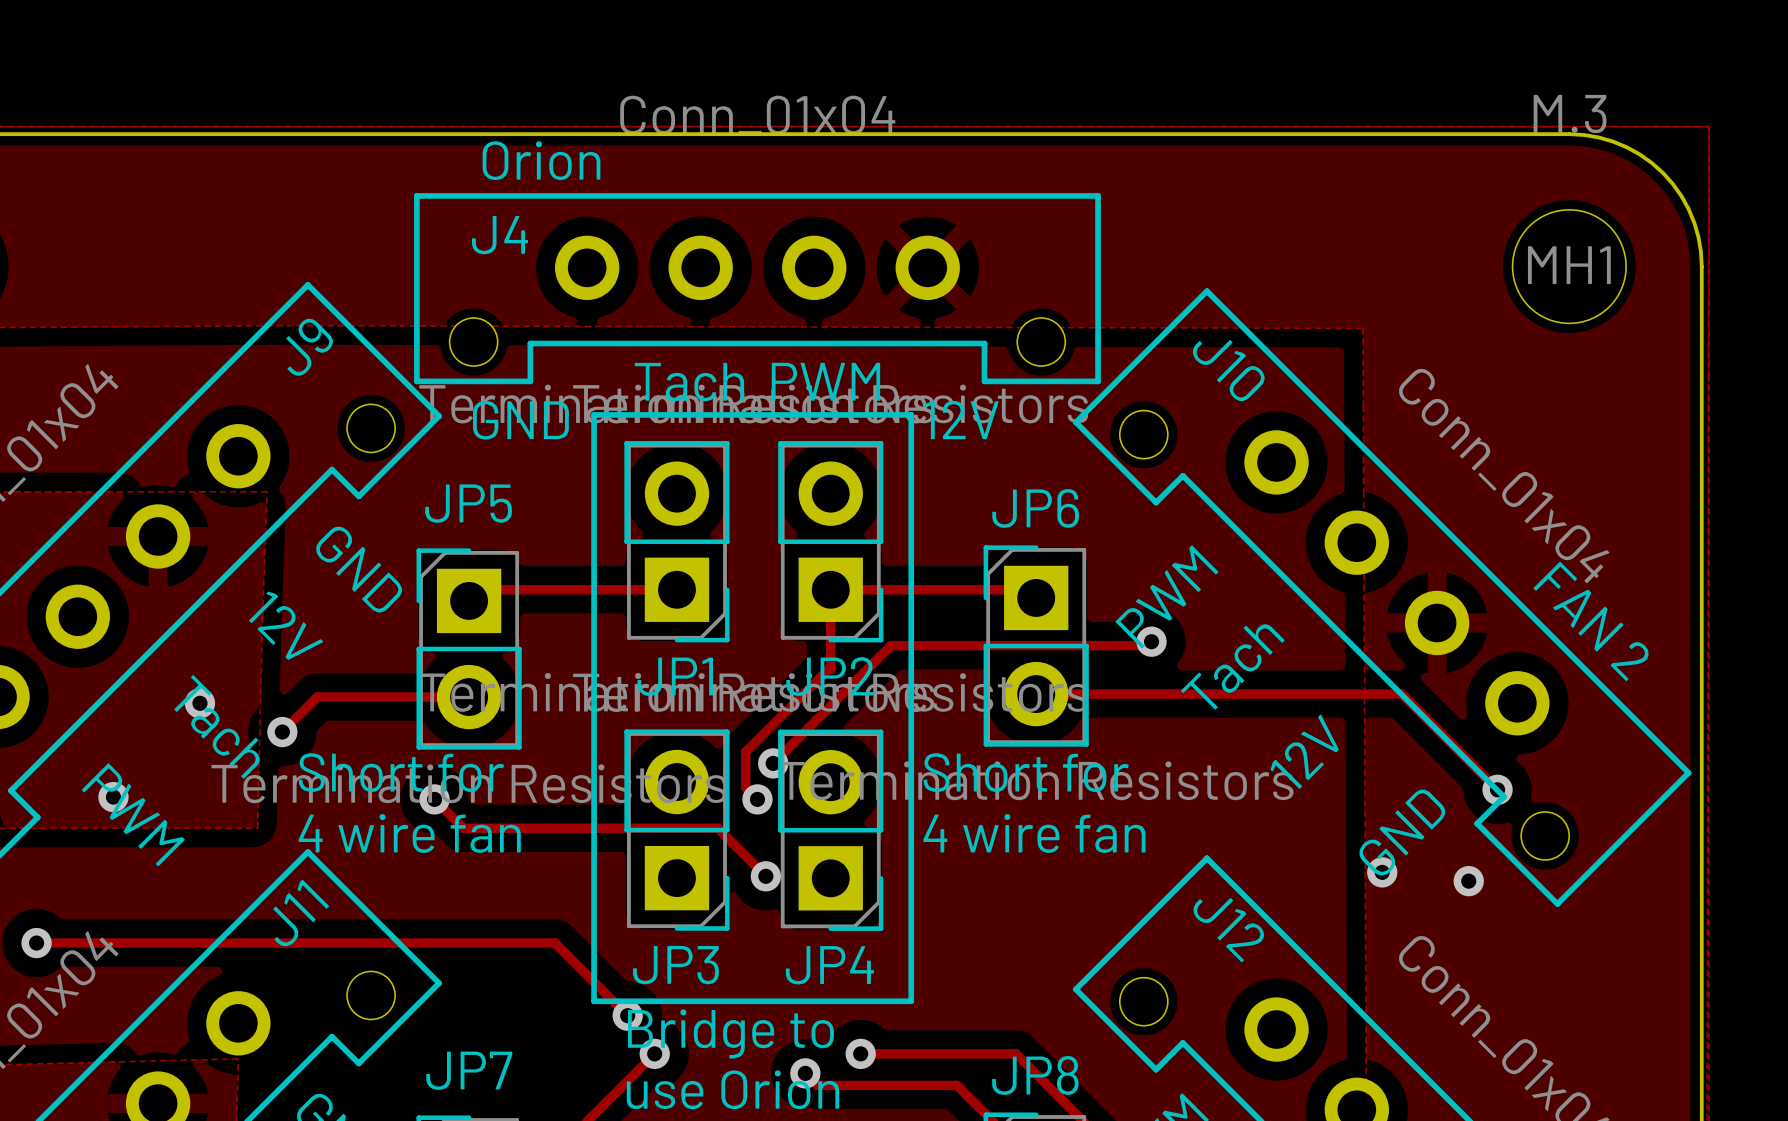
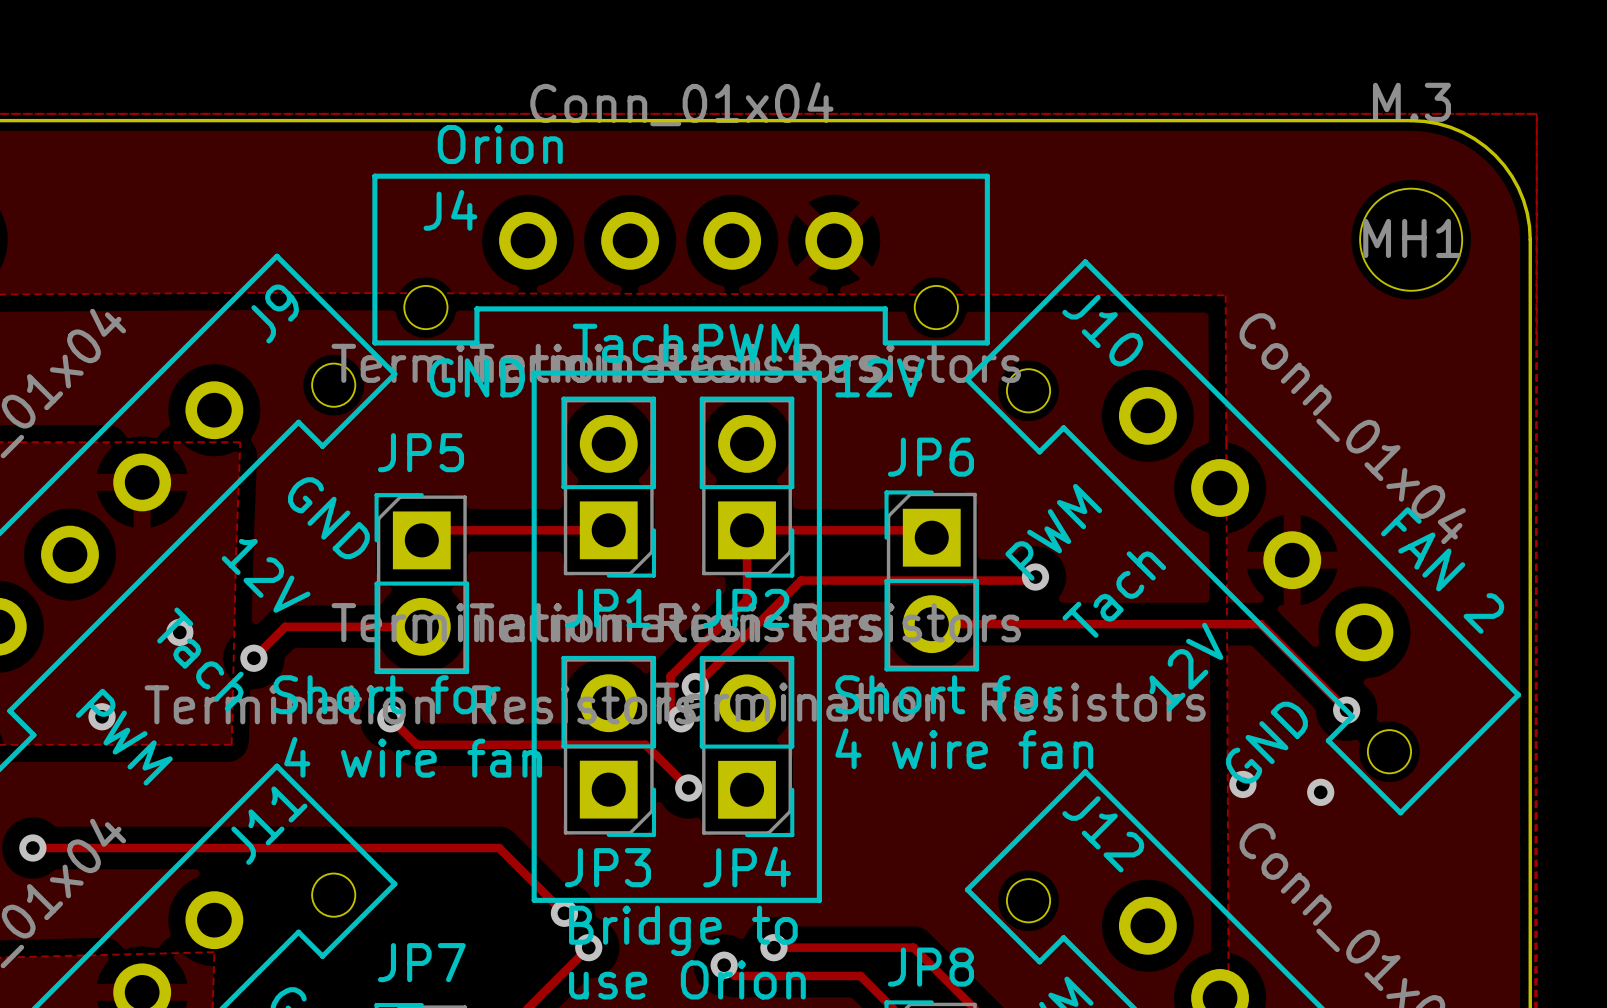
text position: 4 wire fan (409, 833) -> 4 wire fan (413, 757)

